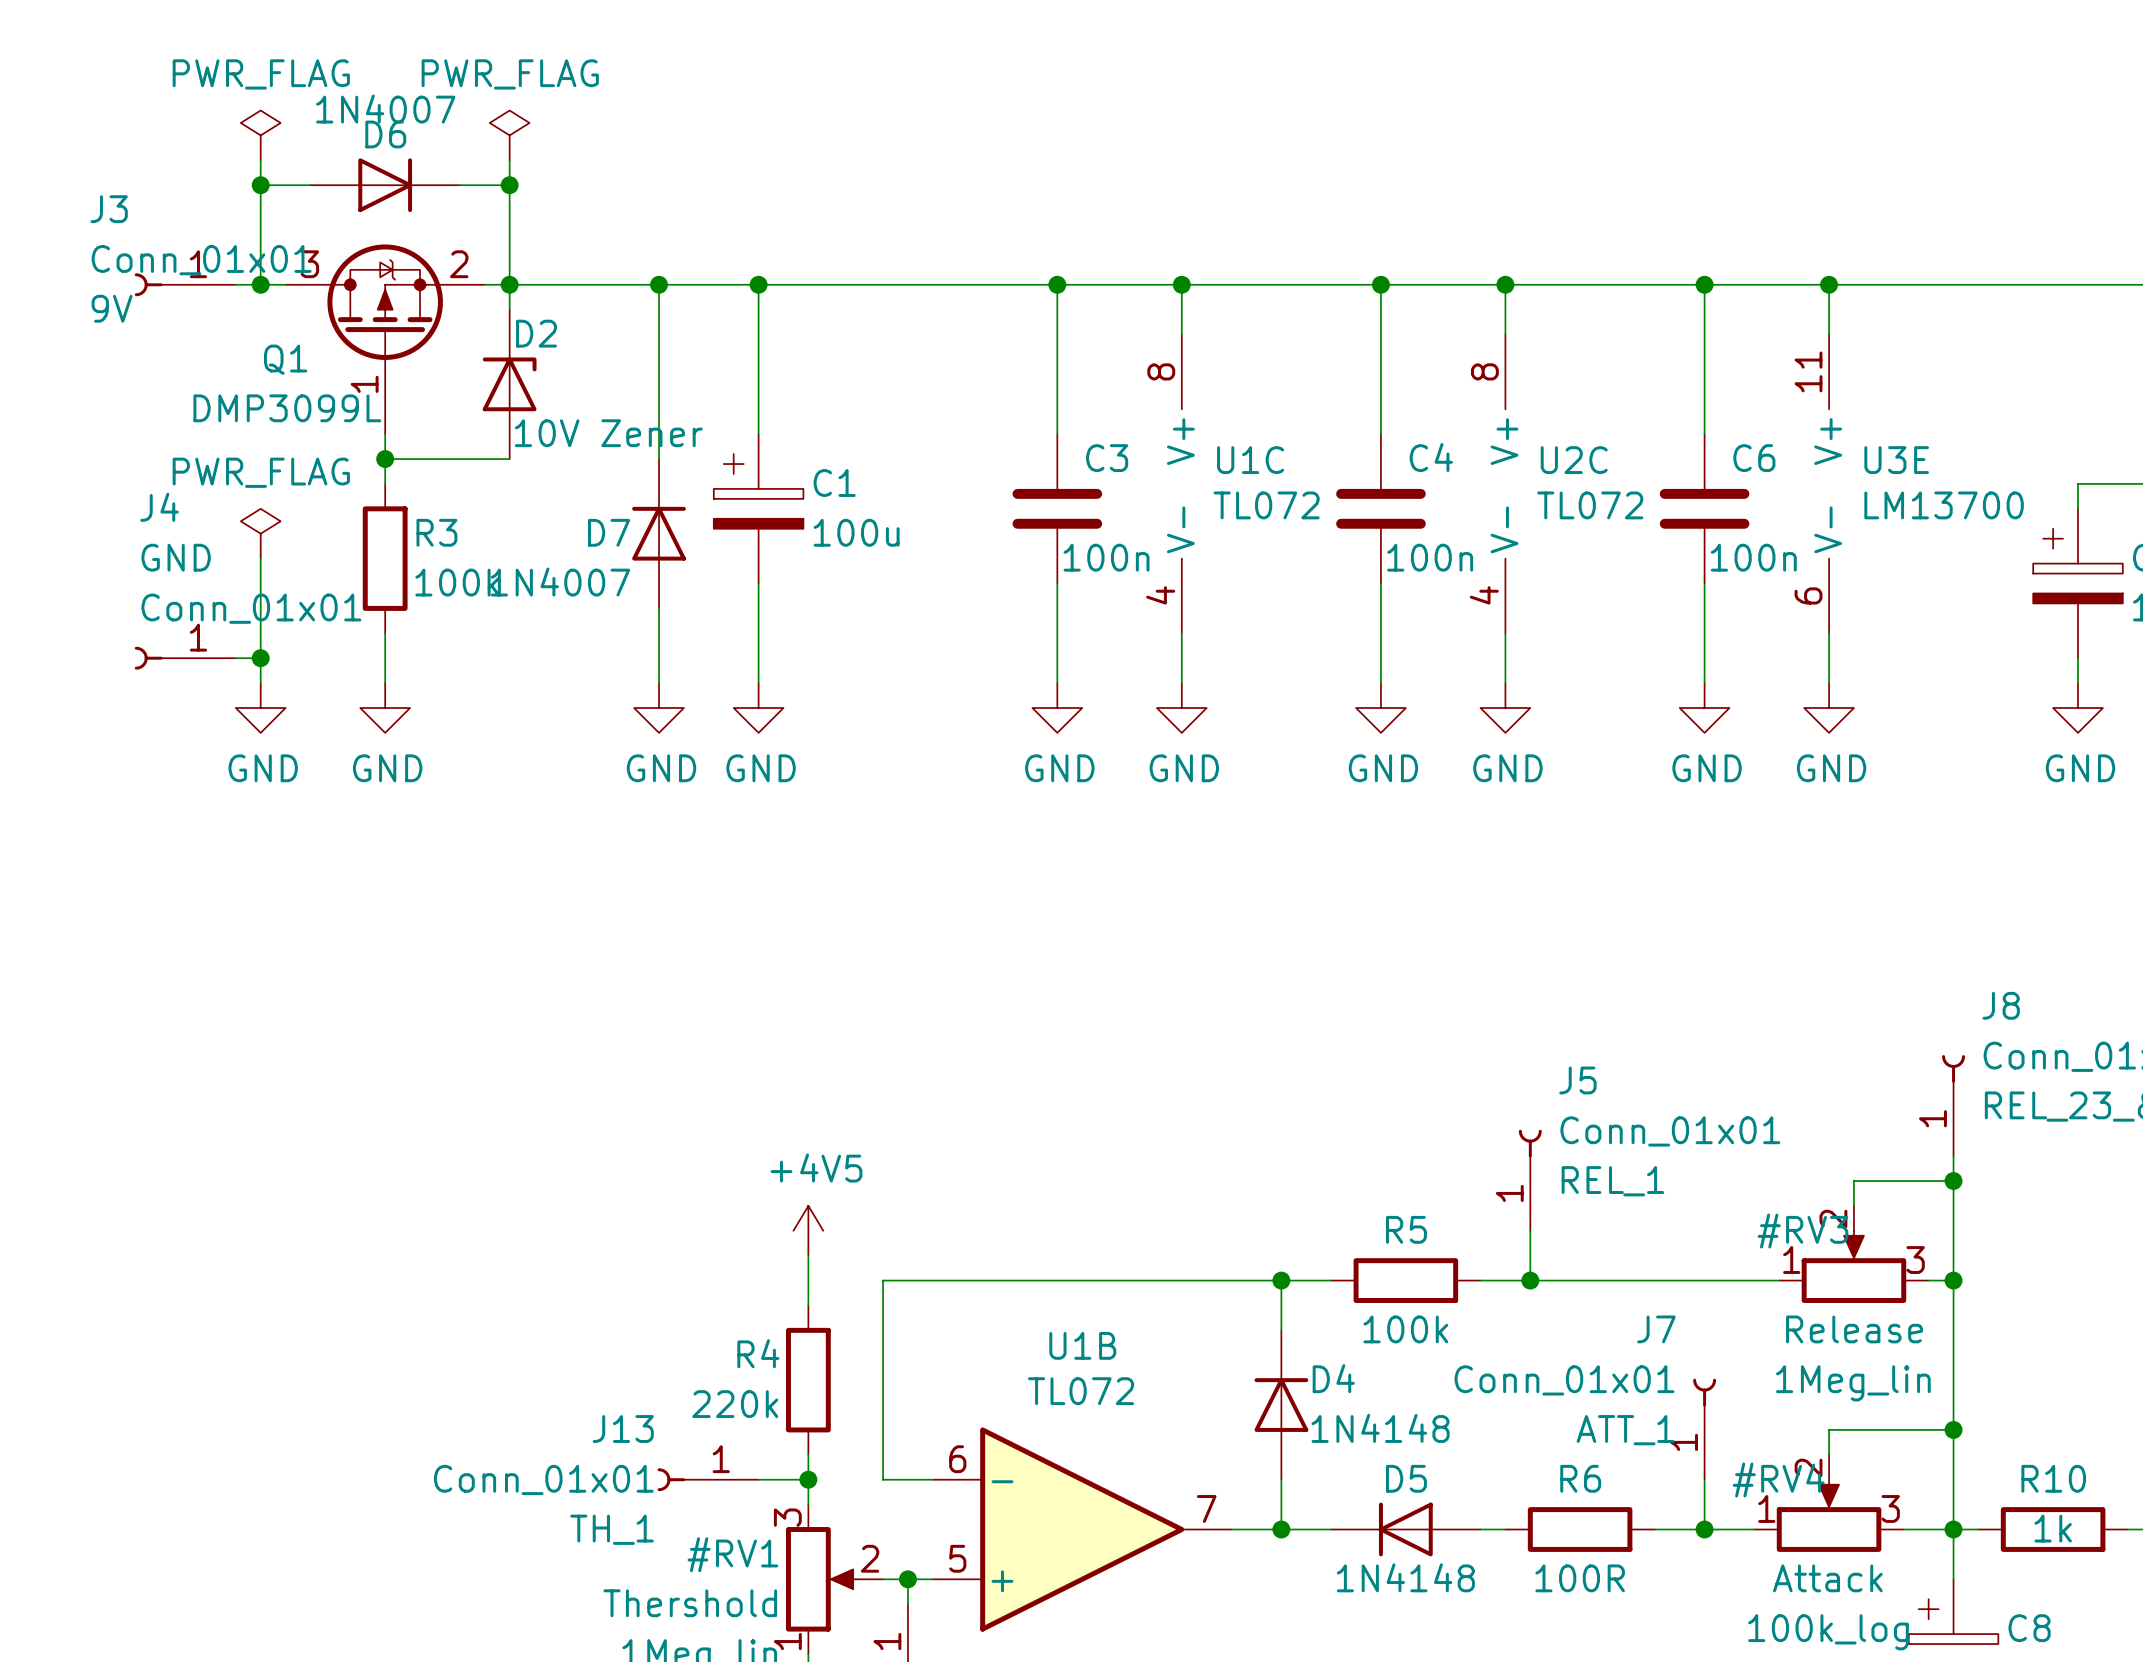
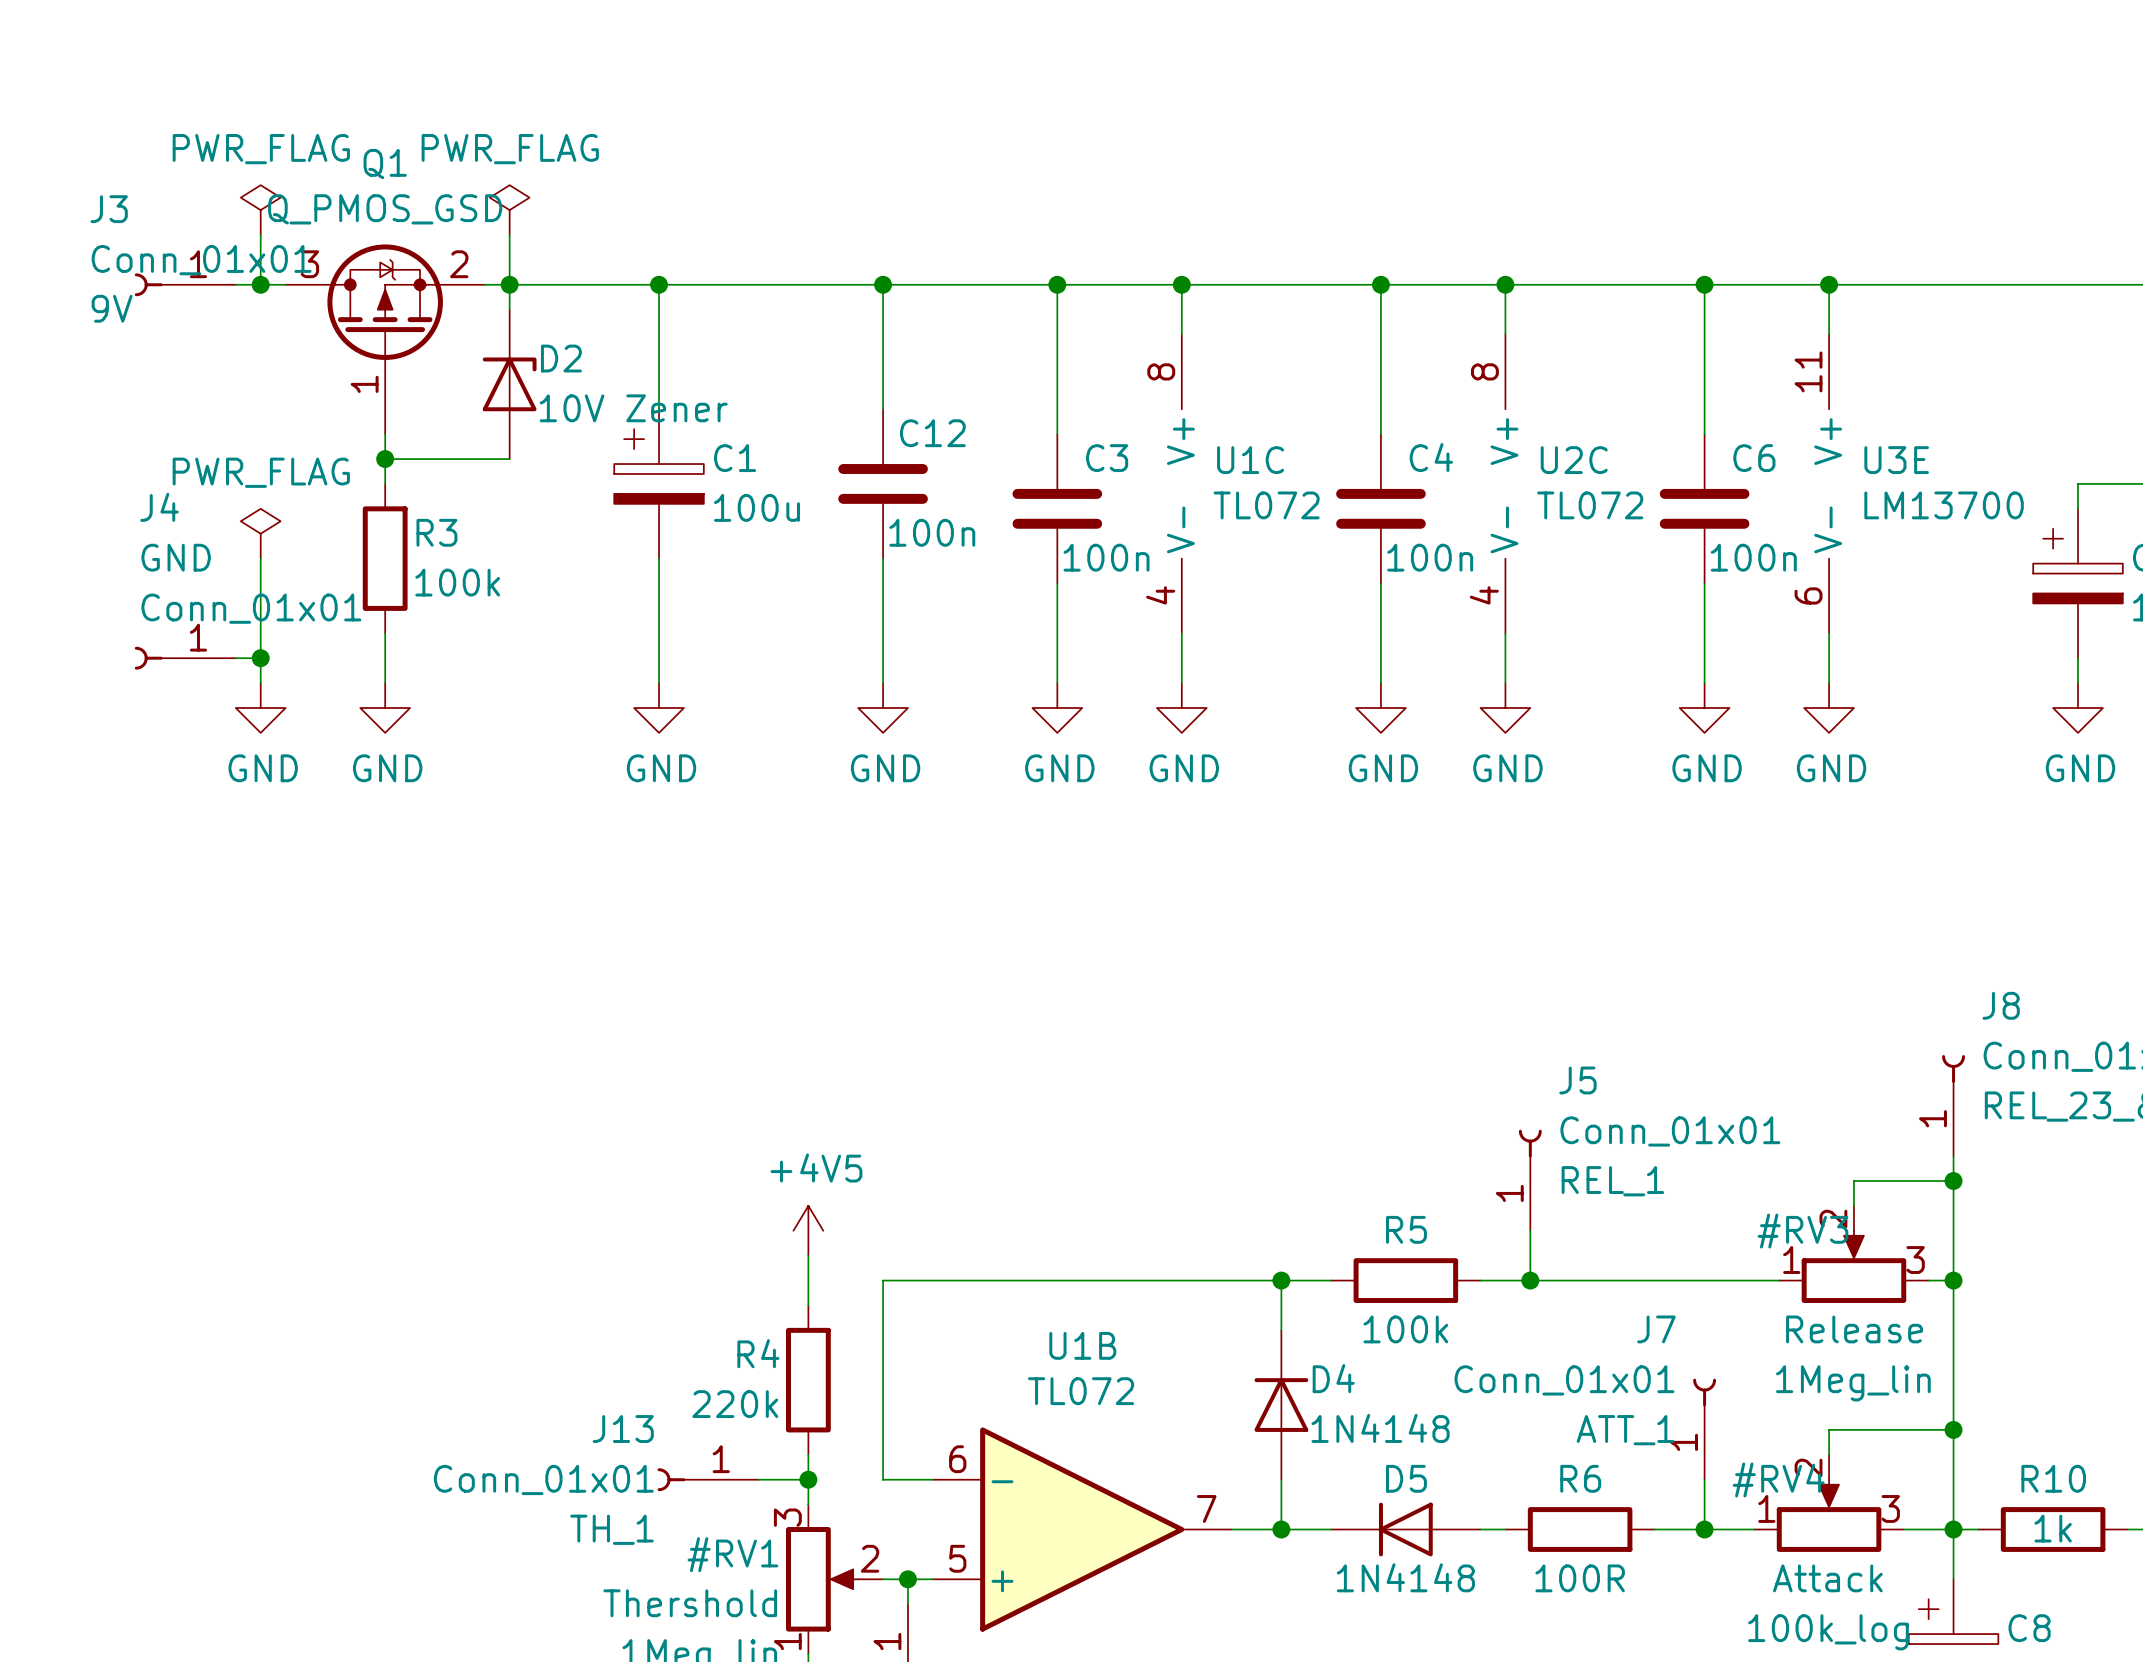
power symbol position: PWR_FLAG (260, 135) -> PWR_FLAG (260, 210)
power symbol position: PWR_FLAG (509, 135) -> PWR_FLAG (509, 210)
wire: (260, 160) (260, 234) -> none
wire: (509, 160) (509, 234) -> none
wire: (260, 185) (310, 185) -> none
junction: (260, 185) -> none
D6: 1N4007 (385, 185) -> none
wire: (459, 185) (509, 185) -> none
junction: (509, 185) -> none
wire: (758, 284) (758, 434) -> none
junction: (758, 284) -> none
wire: none -> (883, 284) (883, 409)
junction: none -> (883, 284)
D2 name position: D2 (536, 333) -> D2 (561, 358)
Q1 name position: Q1 (285, 359) -> Q1 (385, 164)
Q1 value: DMP3099L (287, 408) -> Q_PMOS_GSD (385, 209)
D2 value position: 10V Zener (608, 433) -> 10V Zener (633, 408)
C12: none -> 100n (883, 483)
C1 position: (758, 508) -> (659, 483)
D7: 1N4007 (659, 533) -> none
wire: none -> (883, 558) (883, 683)
wire: (758, 583) (758, 683) -> none
power symbol position: GND (758, 707) -> GND (883, 707)

